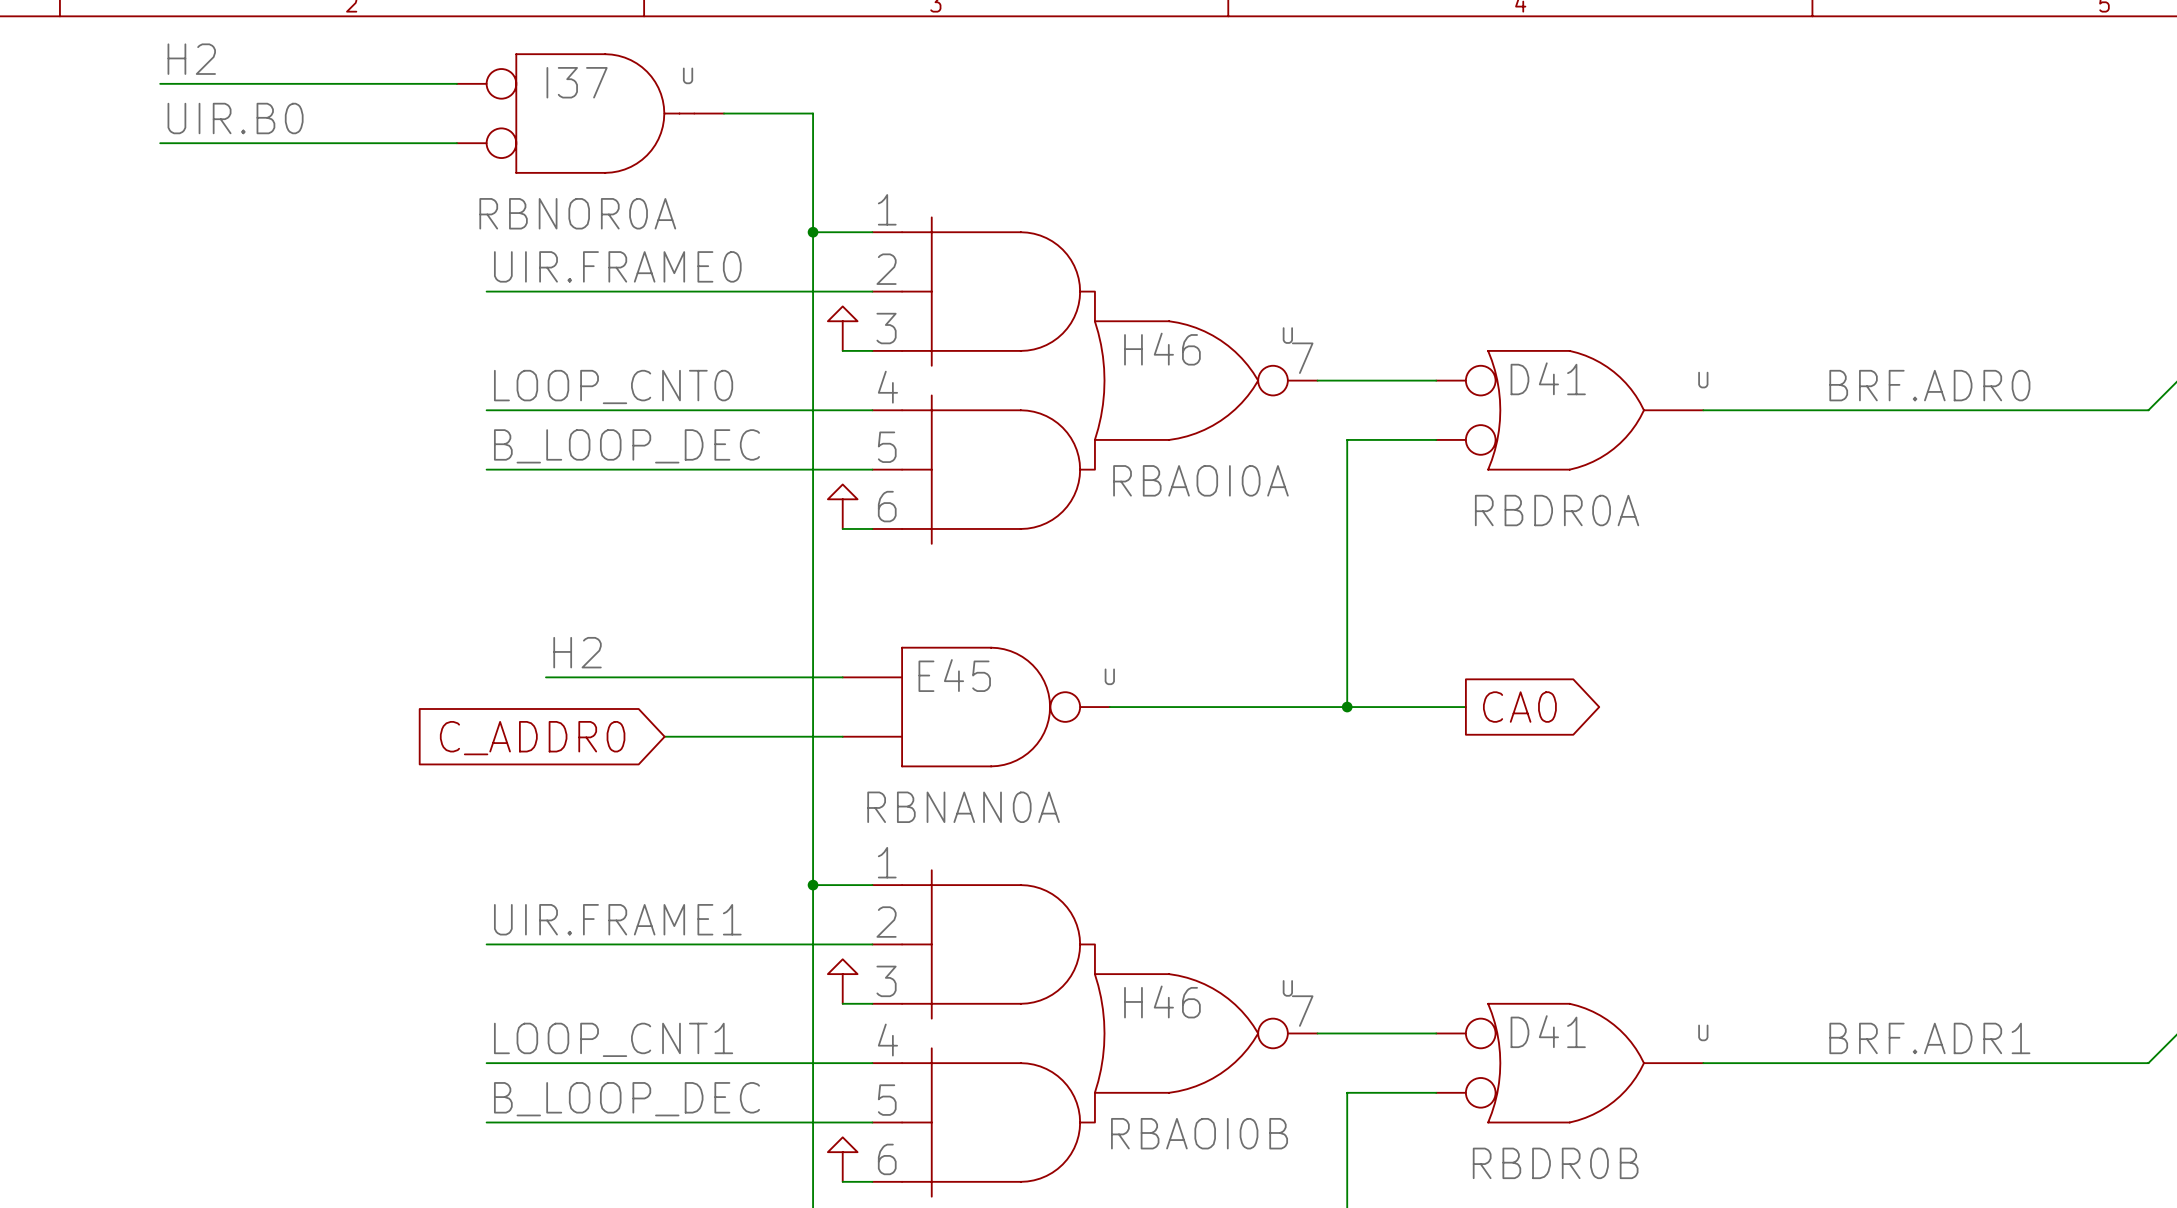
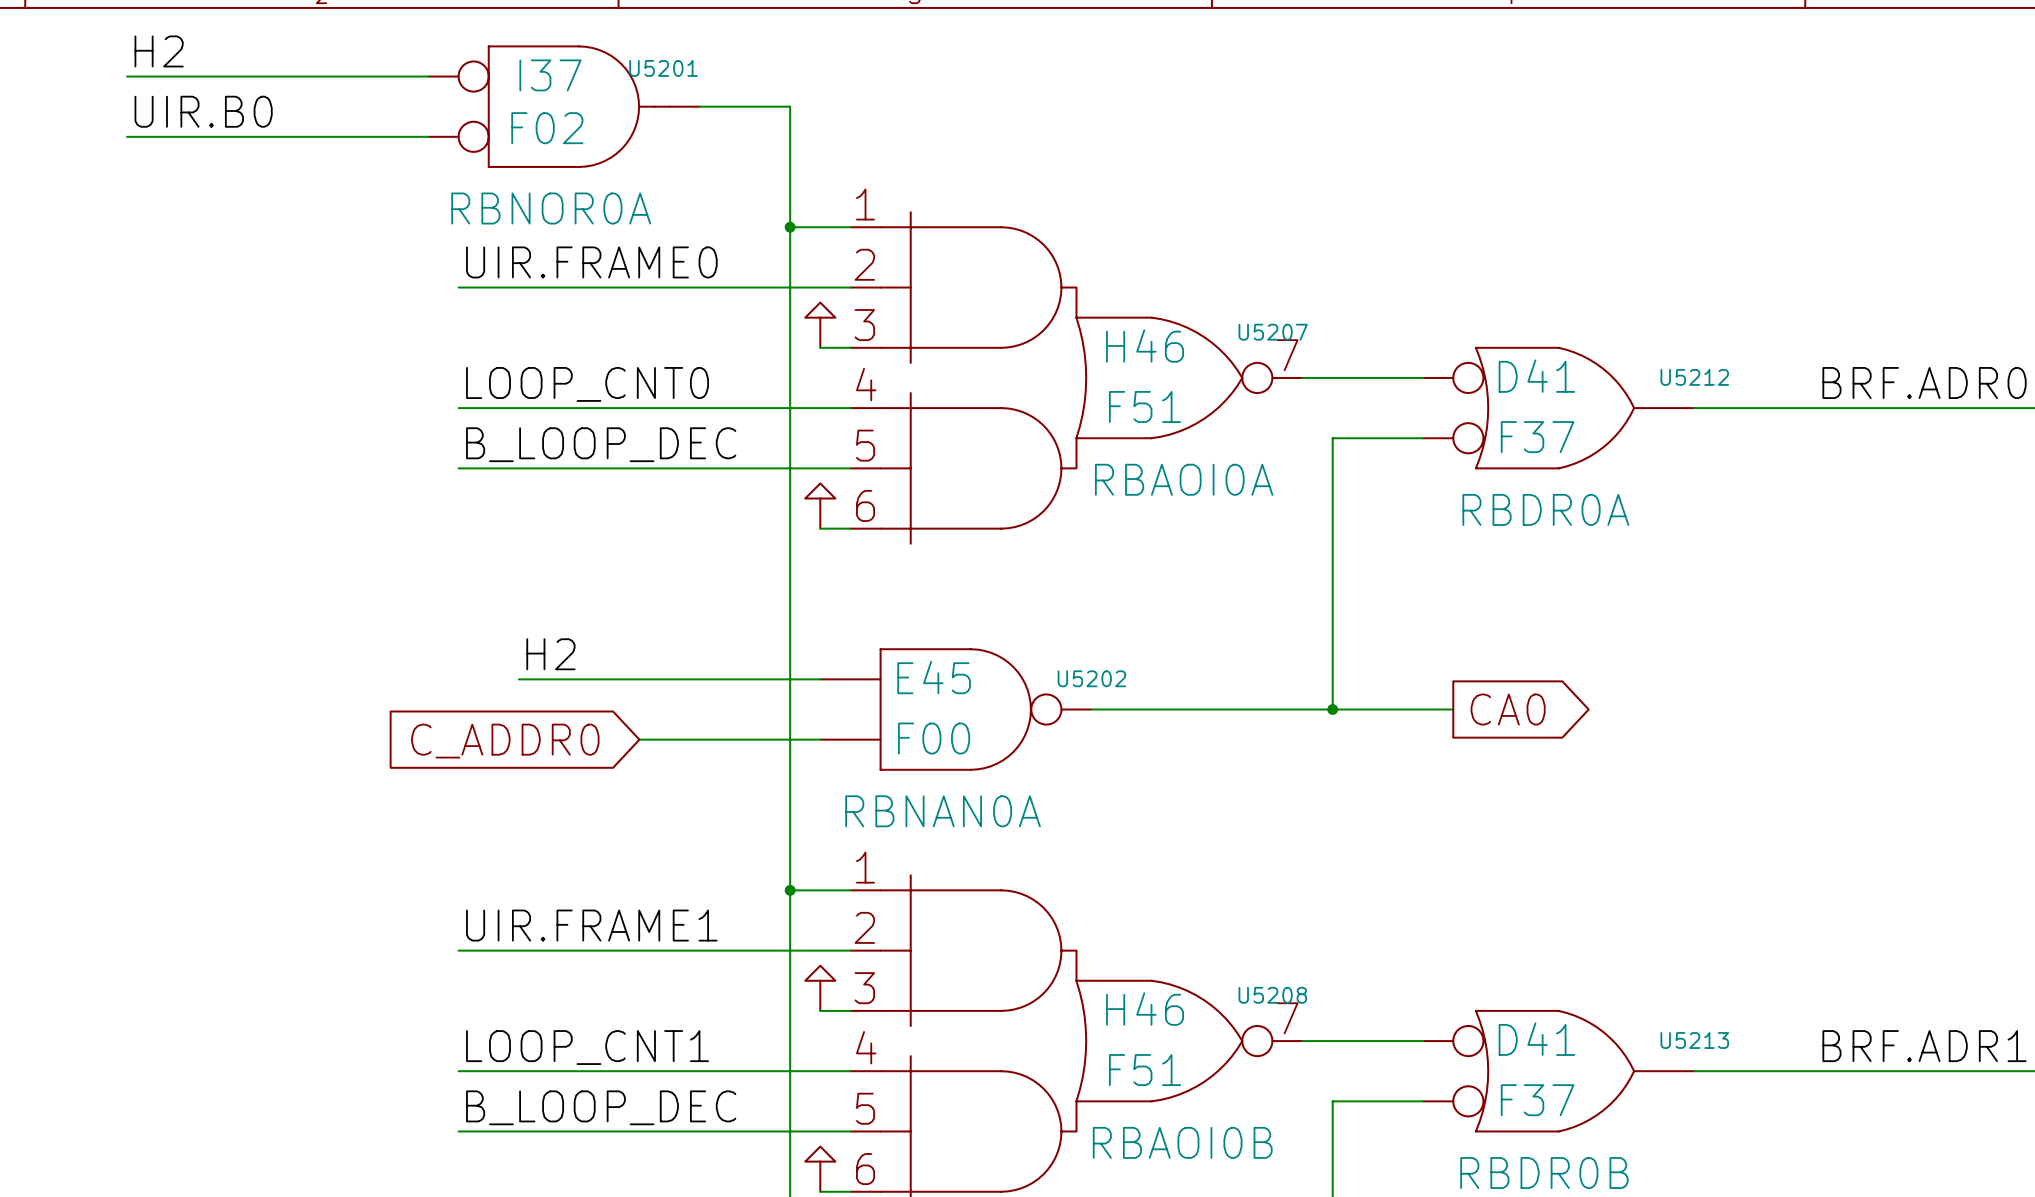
U name: U (688, 75) -> U5201 (663, 68)
U value: none -> F02 (547, 128)
U name: U (1287, 335) -> U5207 (1273, 332)
U name: U (1703, 380) -> U5212 (1694, 377)
U value: none -> F51 (1145, 406)
U value: none -> F37 (1537, 437)
U name: U (1109, 676) -> U5202 (1091, 678)
U value: none -> F00 (934, 738)
U name: U (1287, 988) -> U5208 (1272, 995)
U name: U (1703, 1032) -> U5213 (1694, 1040)
U value: none -> F51 (1145, 1070)
U value: none -> F37 (1537, 1100)

